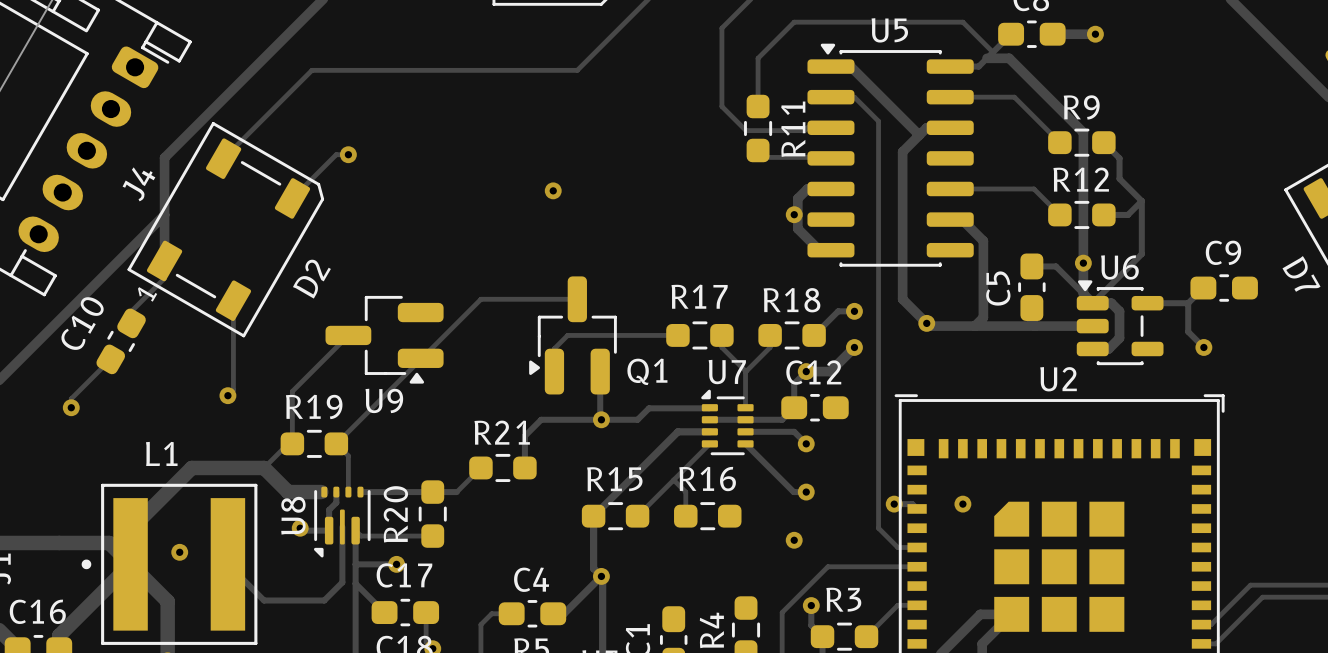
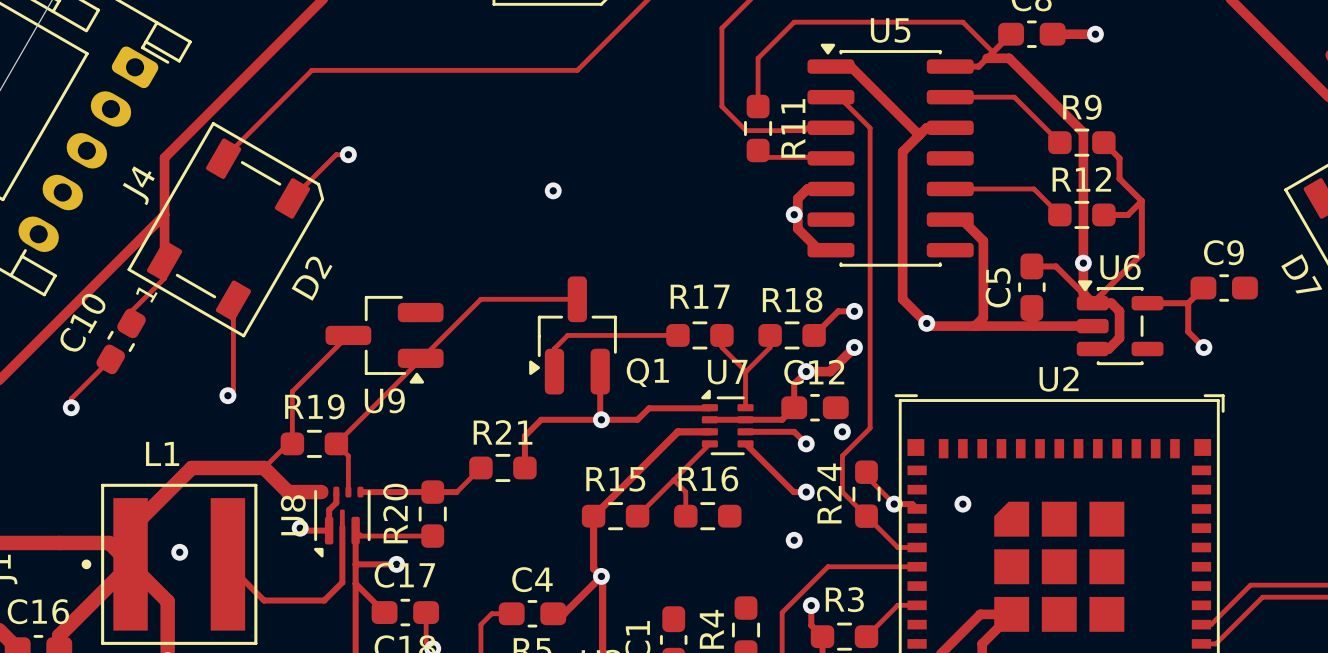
track: (839, 97) (854, 97) (878, 121) (878, 528) -> (839, 97) (870, 128) (870, 428) (842, 455) (842, 492) (878, 528)
via: none -> (842, 431)
track: none -> (866, 472) (866, 476) (894, 504)
R24: none -> (866, 494)

